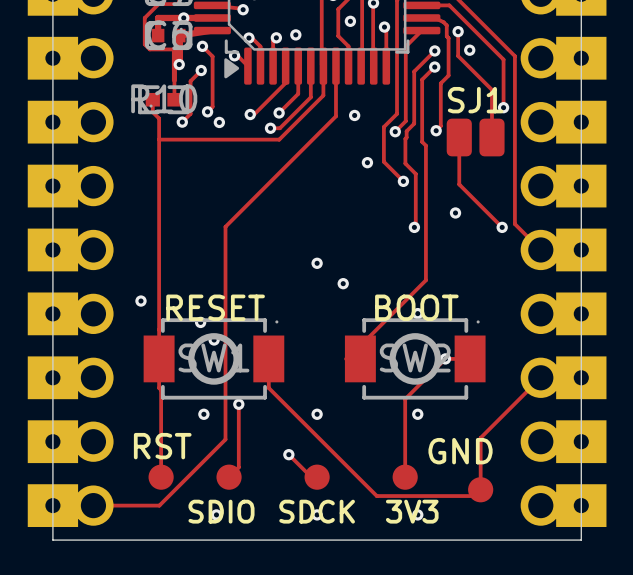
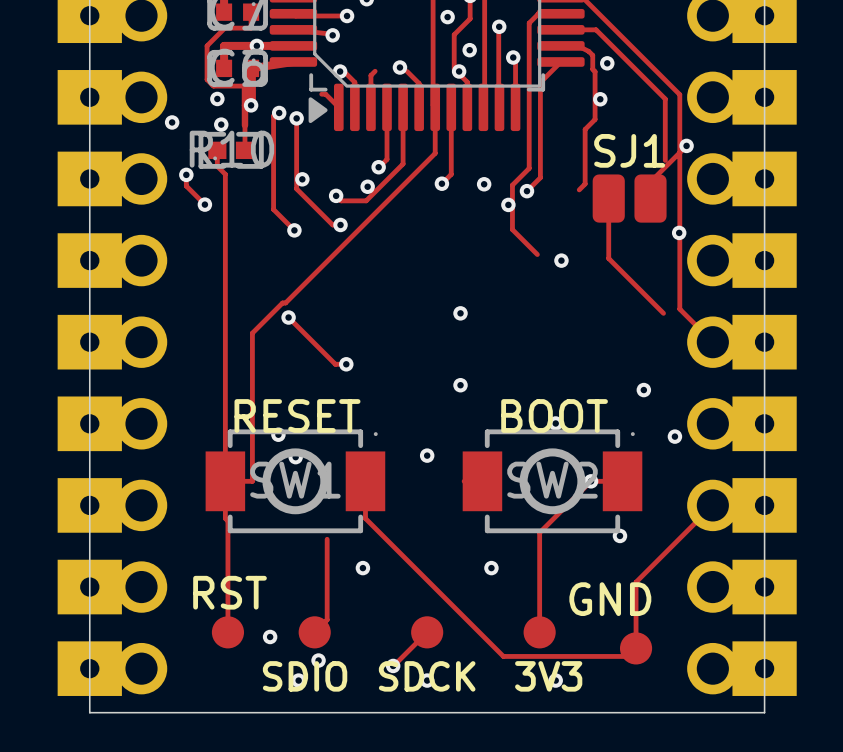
track: (458, 31) (458, 56) (491, 89) (491, 124) -> (686, 145) (650, 181)
via: (276, 37) -> none
via: none -> (459, 71)
track: (202, 46) (212, 56) (212, 106) (207, 111) -> none
via: (202, 46) -> none
track: (434, 50) (414, 71) (414, 123) (406, 131) (405, 138) (405, 163) (415, 173) (414, 227) -> none
via: (434, 50) -> none
via: (469, 50) -> none
via: (234, 55) -> none
via: none -> (217, 98)
via: none -> (600, 99)
track: (310, 66) (310, 97) (279, 128) (270, 128) -> (419, 107) (419, 83) (407, 71)
track: (434, 67) (422, 79) (422, 141) (425, 145) (425, 280) (347, 358) -> none
via: (434, 67) -> none
track: (201, 70) (190, 81) (190, 113) (182, 122) -> none
track: none -> (273, 116) (273, 209) (294, 230)
track: none -> (296, 118) (296, 188) (332, 224) (340, 224)
via: none -> (296, 118)
via: none -> (172, 122)
via: none -> (221, 124)
track: (285, 82) (254, 114) (250, 114) -> (387, 128) (387, 159) (377, 168)
track: (298, 93) (279, 112) -> (403, 142) (403, 163) (366, 200) (341, 200) (336, 195)
track: (323, 95) (279, 139) (159, 139) -> (435, 144) (435, 153) (285, 303) (282, 303) (252, 333) (252, 481) (225, 481)
via position: (503, 107) -> (686, 145)
via: (207, 111) -> none
via position: (250, 114) -> (336, 195)
via position: (354, 115) -> (484, 184)
track: (335, 116) (225, 226) (225, 439) (159, 505) (93, 505) -> (451, 171) (451, 174) (441, 183)
track: none -> (186, 174) (186, 186) (204, 204)
via: none -> (186, 174)
via: (182, 122) -> none
via: none -> (441, 183)
via: (436, 130) -> none
via: none -> (204, 204)
via: none -> (508, 204)
via: none -> (340, 224)
via: none -> (294, 230)
via: (367, 162) -> none
via: none -> (679, 232)
via position: (403, 181) -> (561, 260)
via: (455, 212) -> none
via: none -> (460, 313)
via: (414, 227) -> none
via: (502, 227) -> none
track: none -> (288, 317) (335, 364) (346, 364)
via: none -> (288, 317)
via: (317, 263) -> none
via: none -> (346, 364)
via: none -> (643, 390)
via: (140, 301) -> none
via: none -> (674, 436)
via: none -> (427, 455)
via: none -> (619, 535)
via: (238, 404) -> none
via: (203, 414) -> none
via: (317, 414) -> none
via: (417, 414) -> none
via: none -> (362, 568)
via: none -> (491, 568)
track: (288, 454) (311, 477) (317, 477) -> (393, 665) (427, 632)
via: (288, 454) -> none
via: none -> (270, 636)
via: none -> (318, 660)
via: none -> (393, 665)

